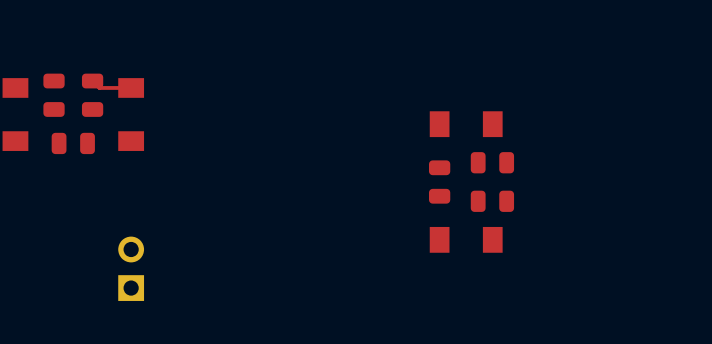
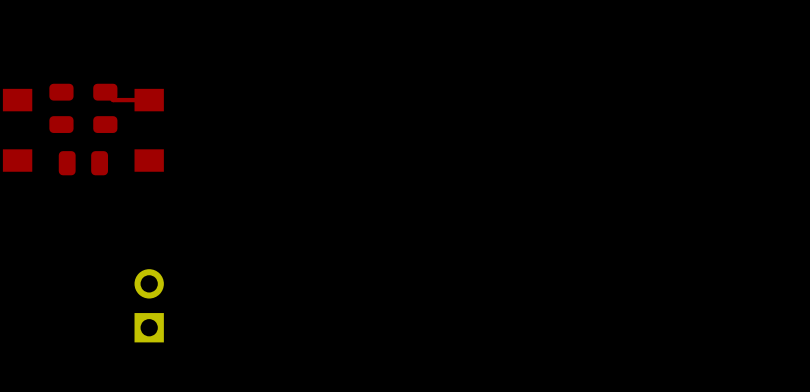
part: (466, 124) -> none
part: (492, 162) -> none
part: (439, 182) -> none
part: (492, 201) -> none
part: (466, 239) -> none

